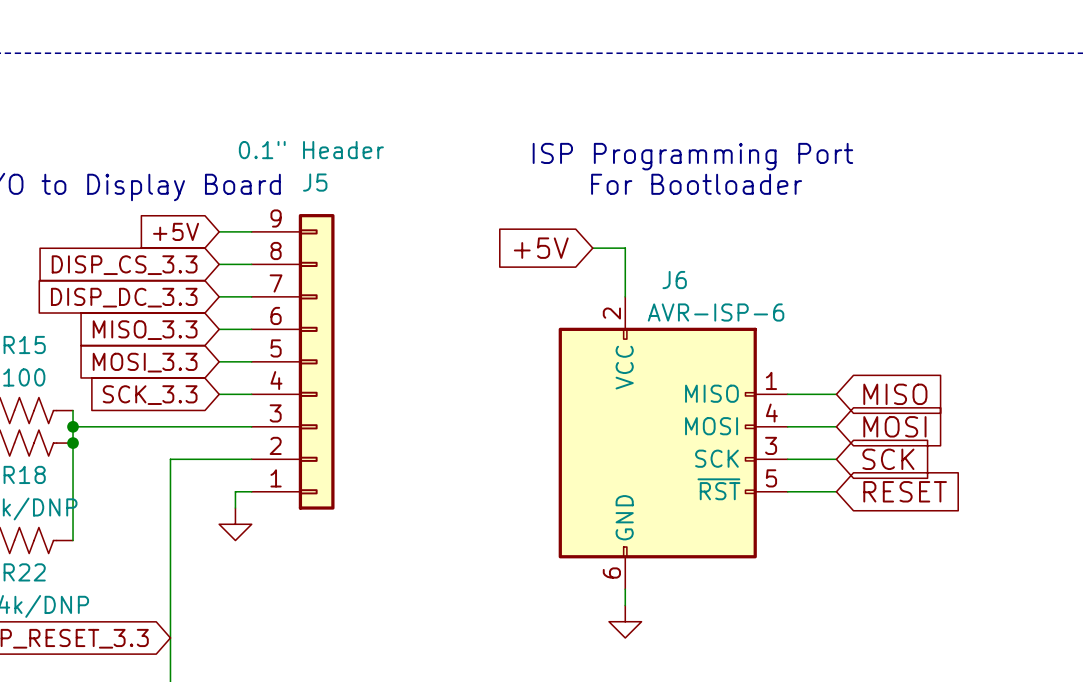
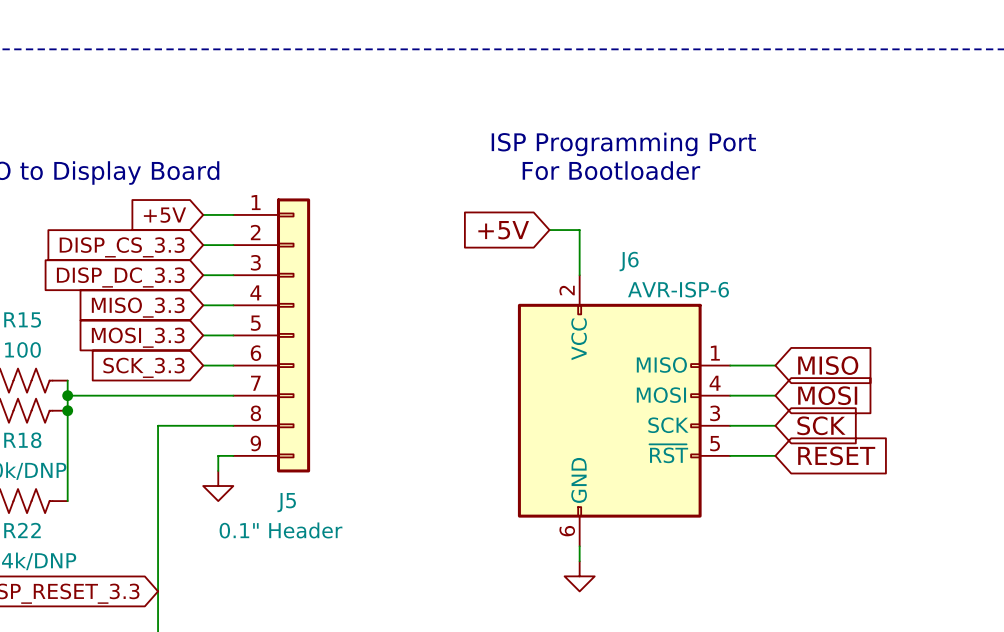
J5 flip: as is (316, 361) -> up-down (293, 335)

